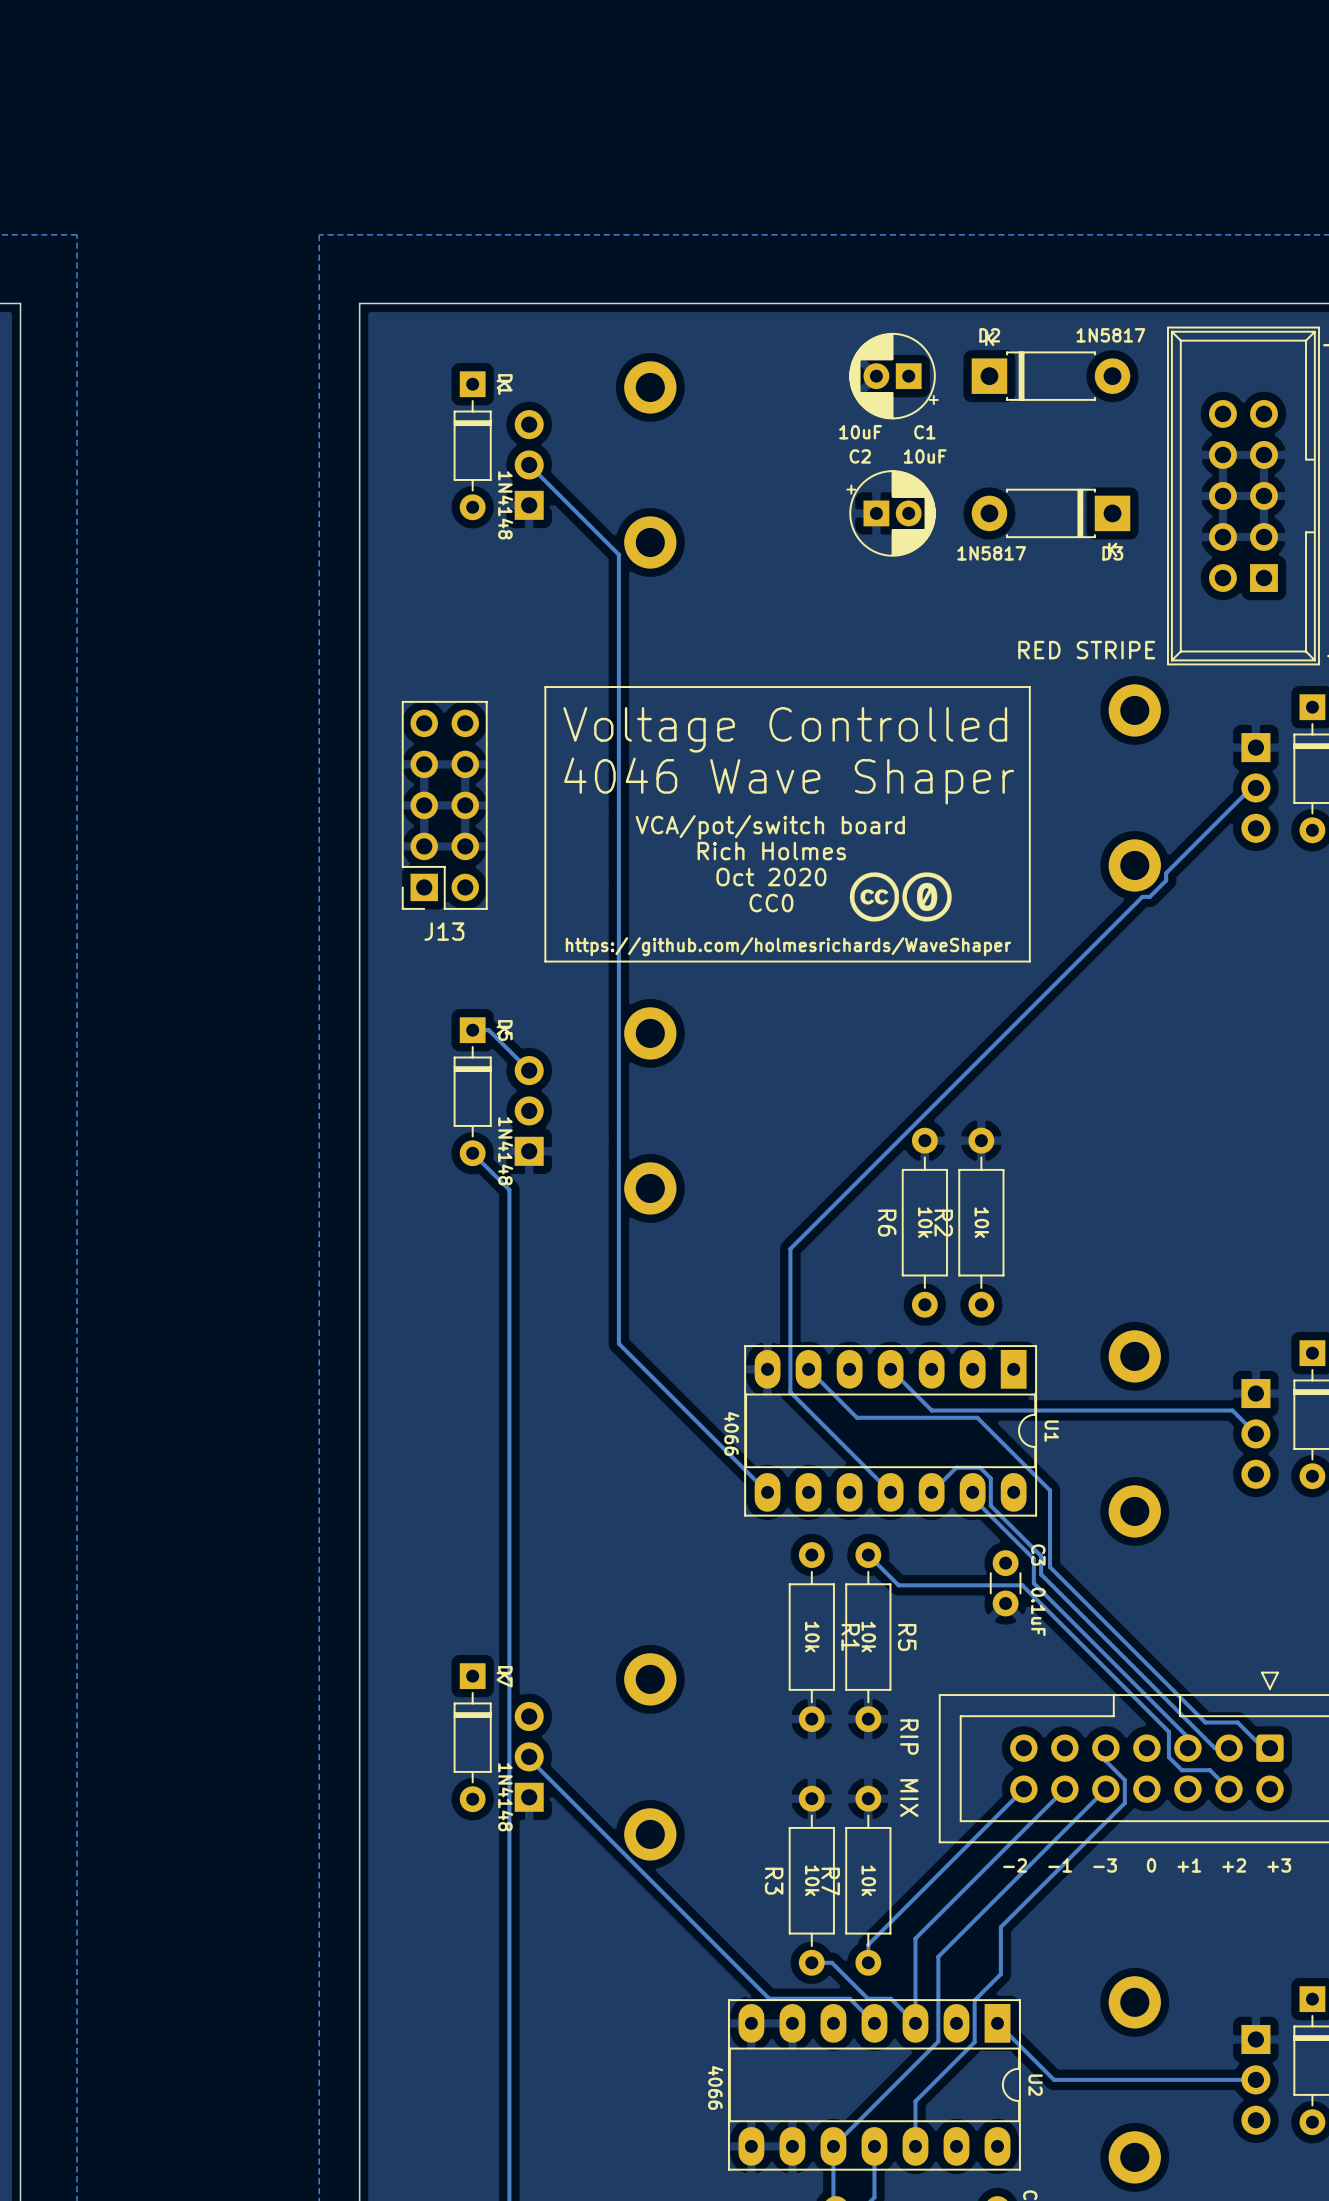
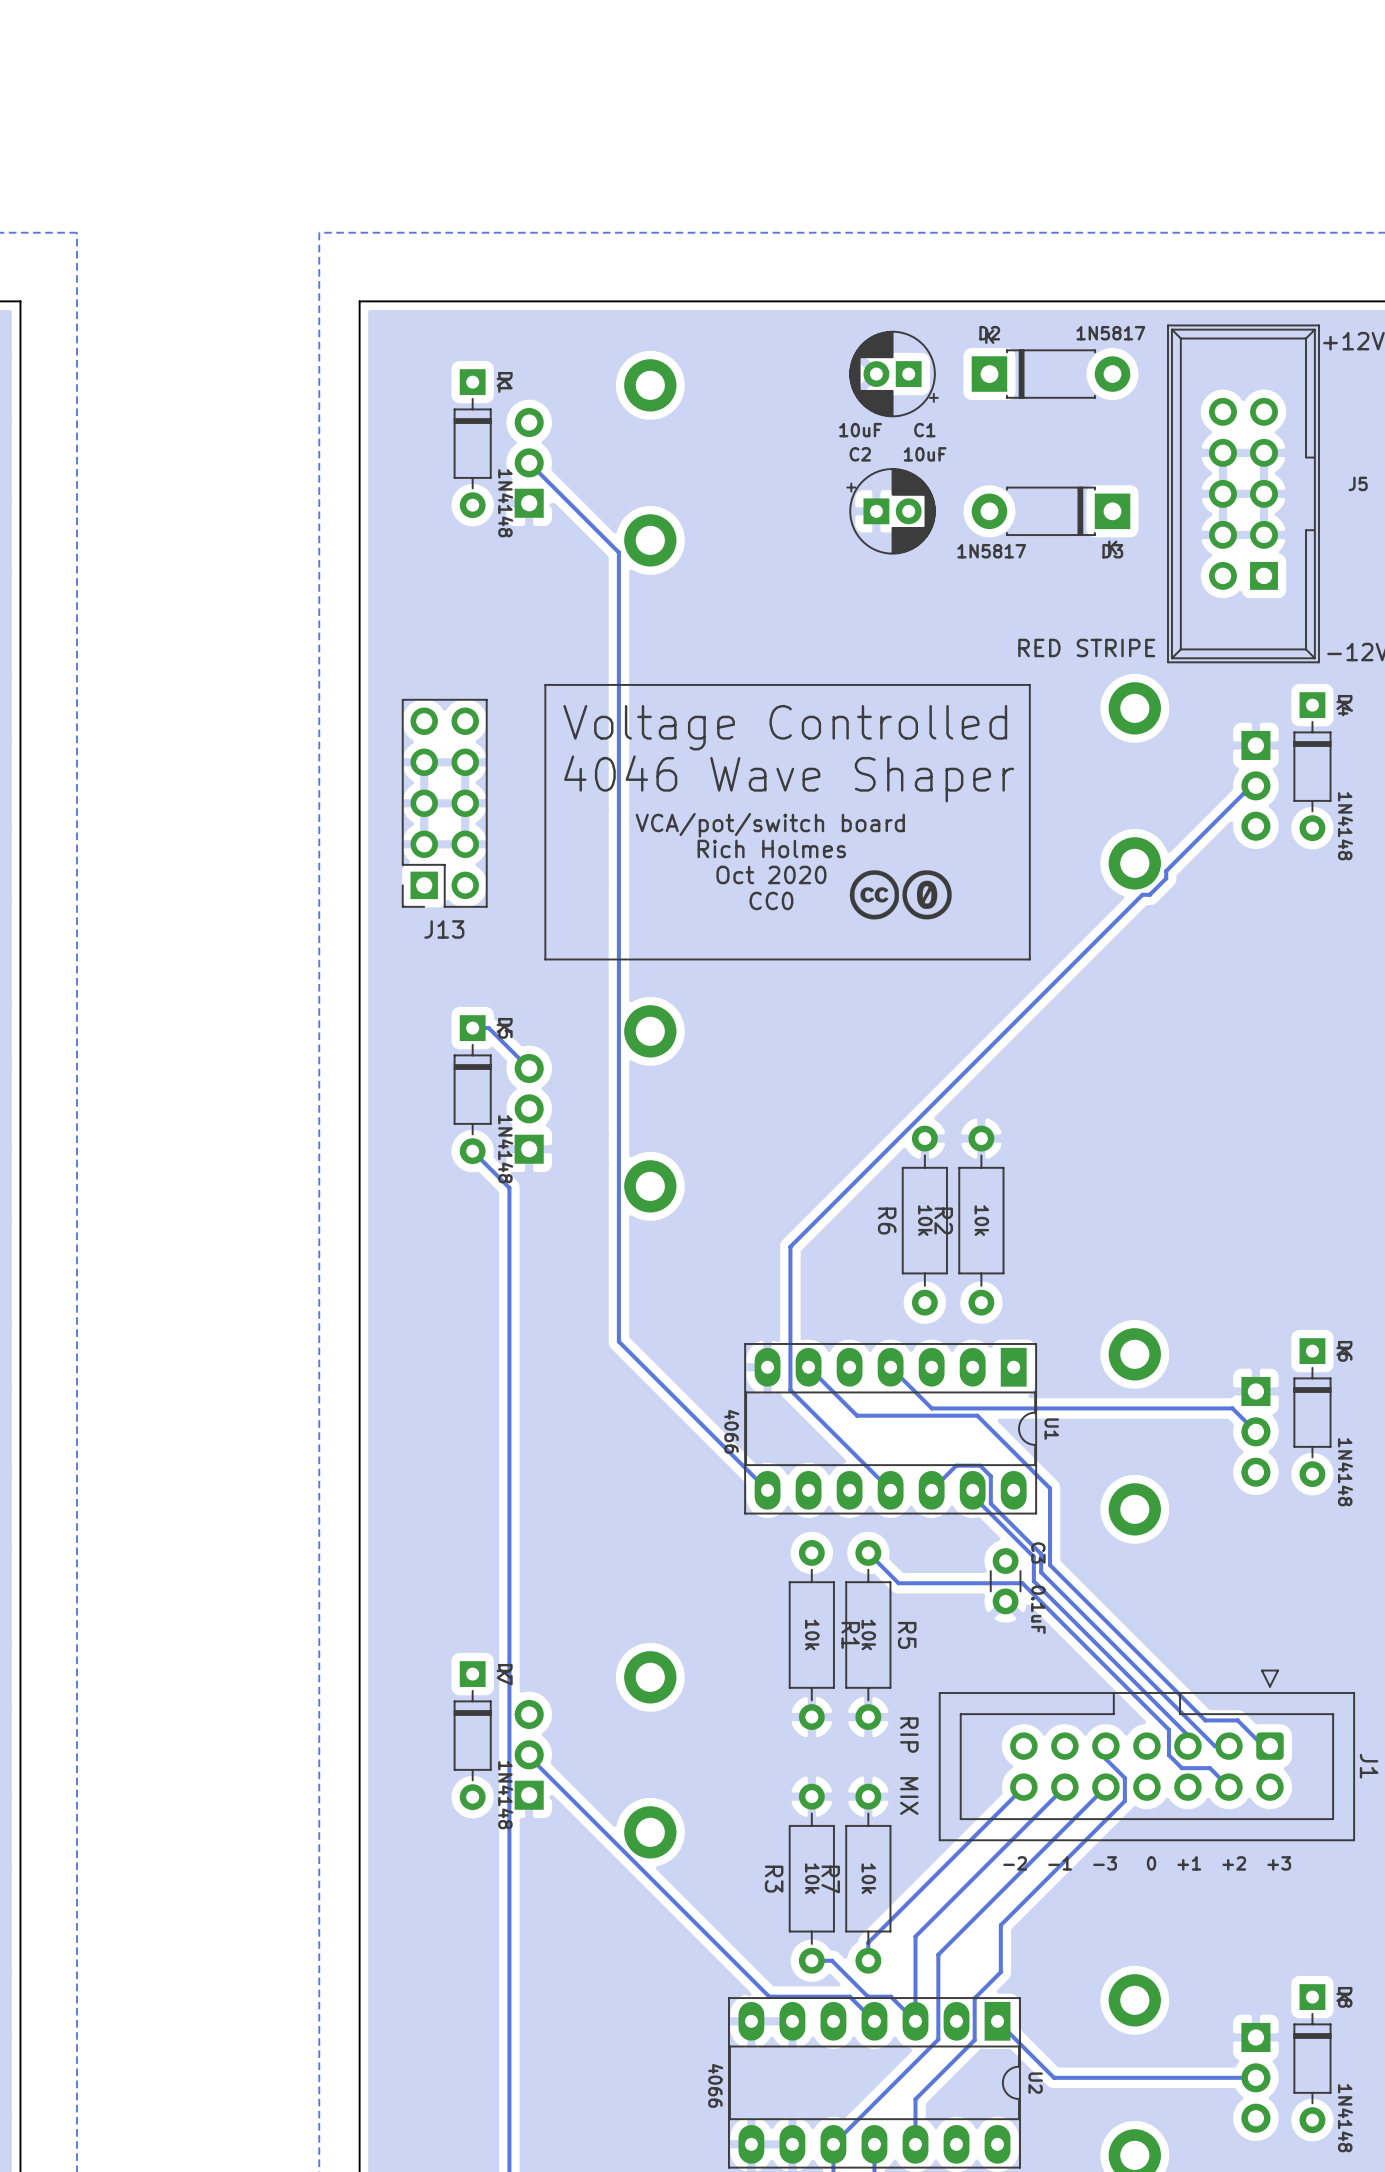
text: https://github.com/holmesrichards/WaveShaper (788, 946) -> none

